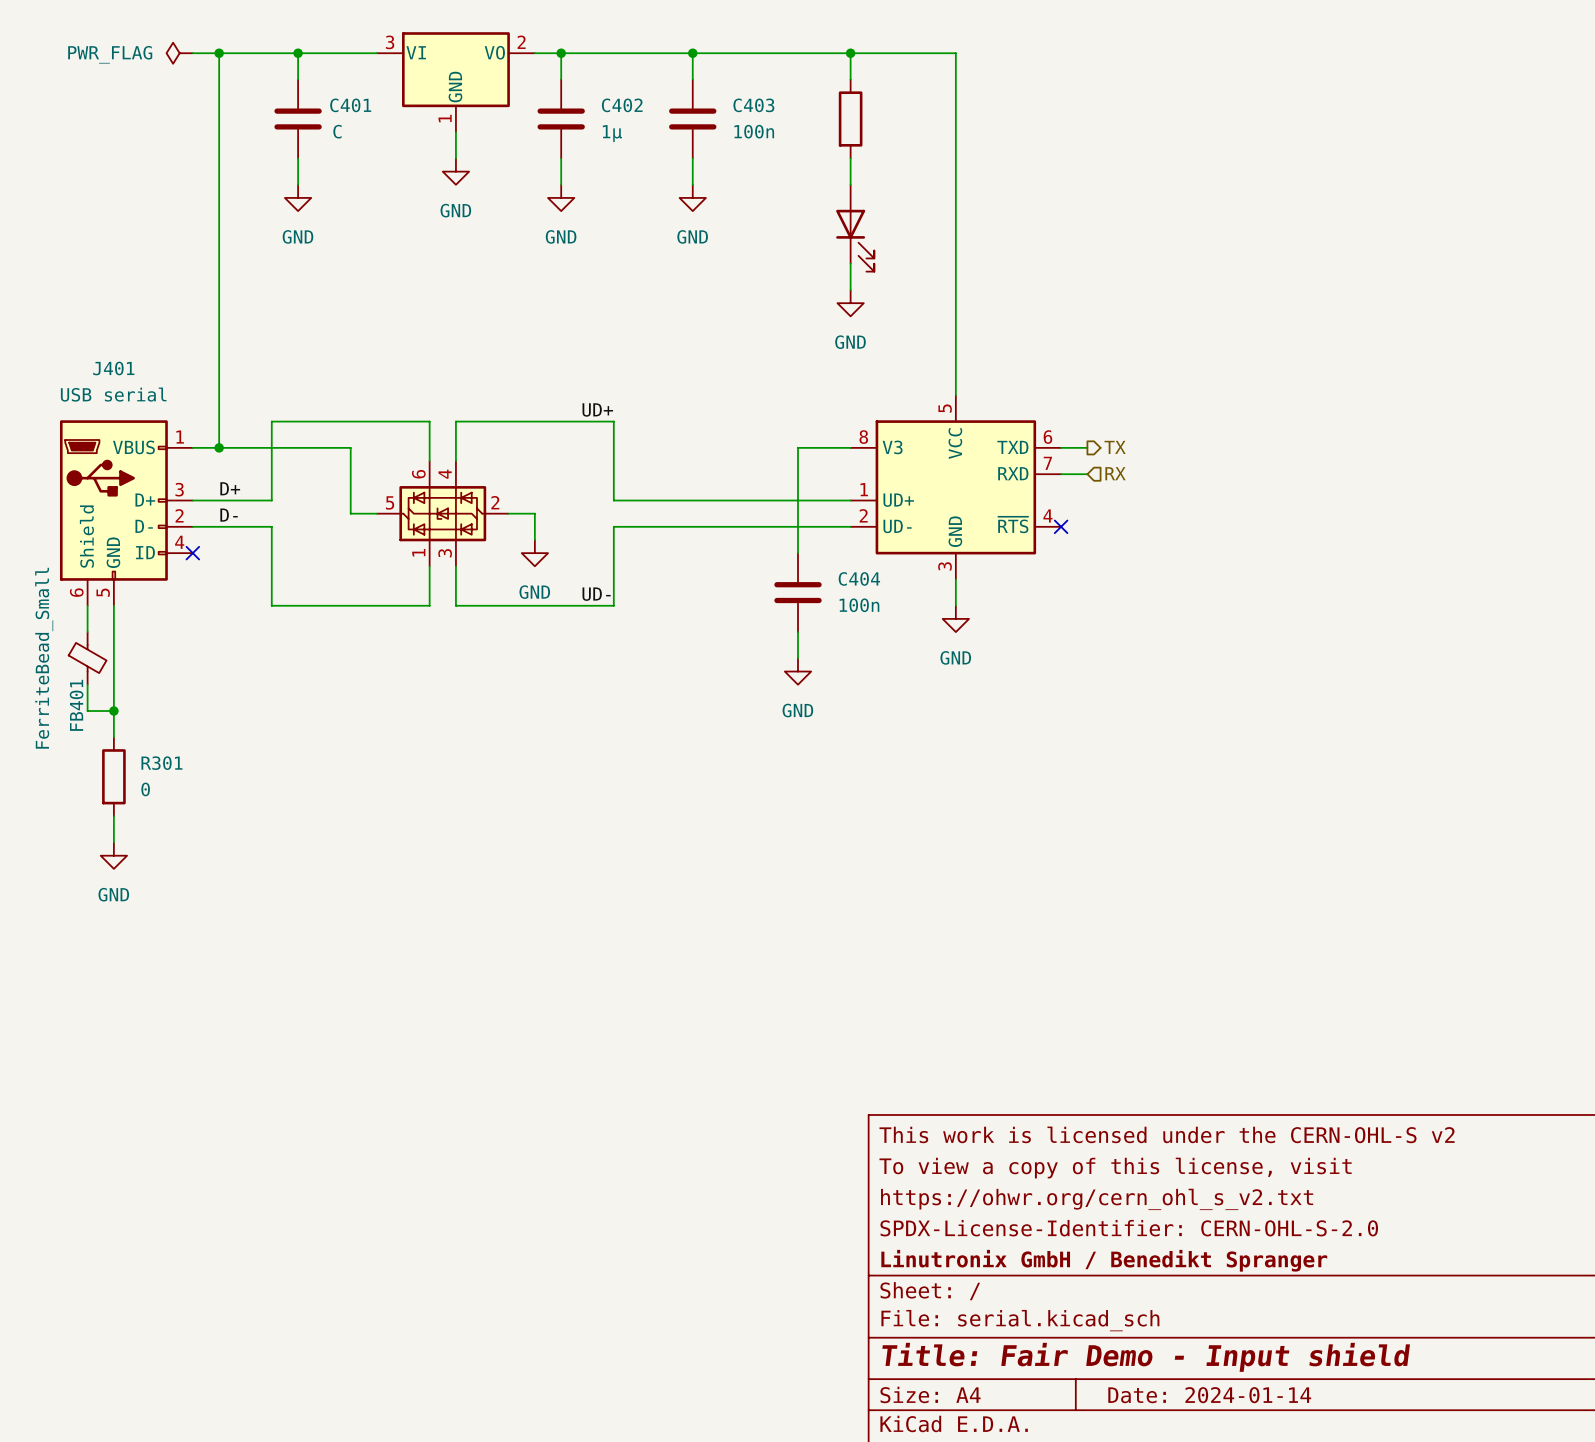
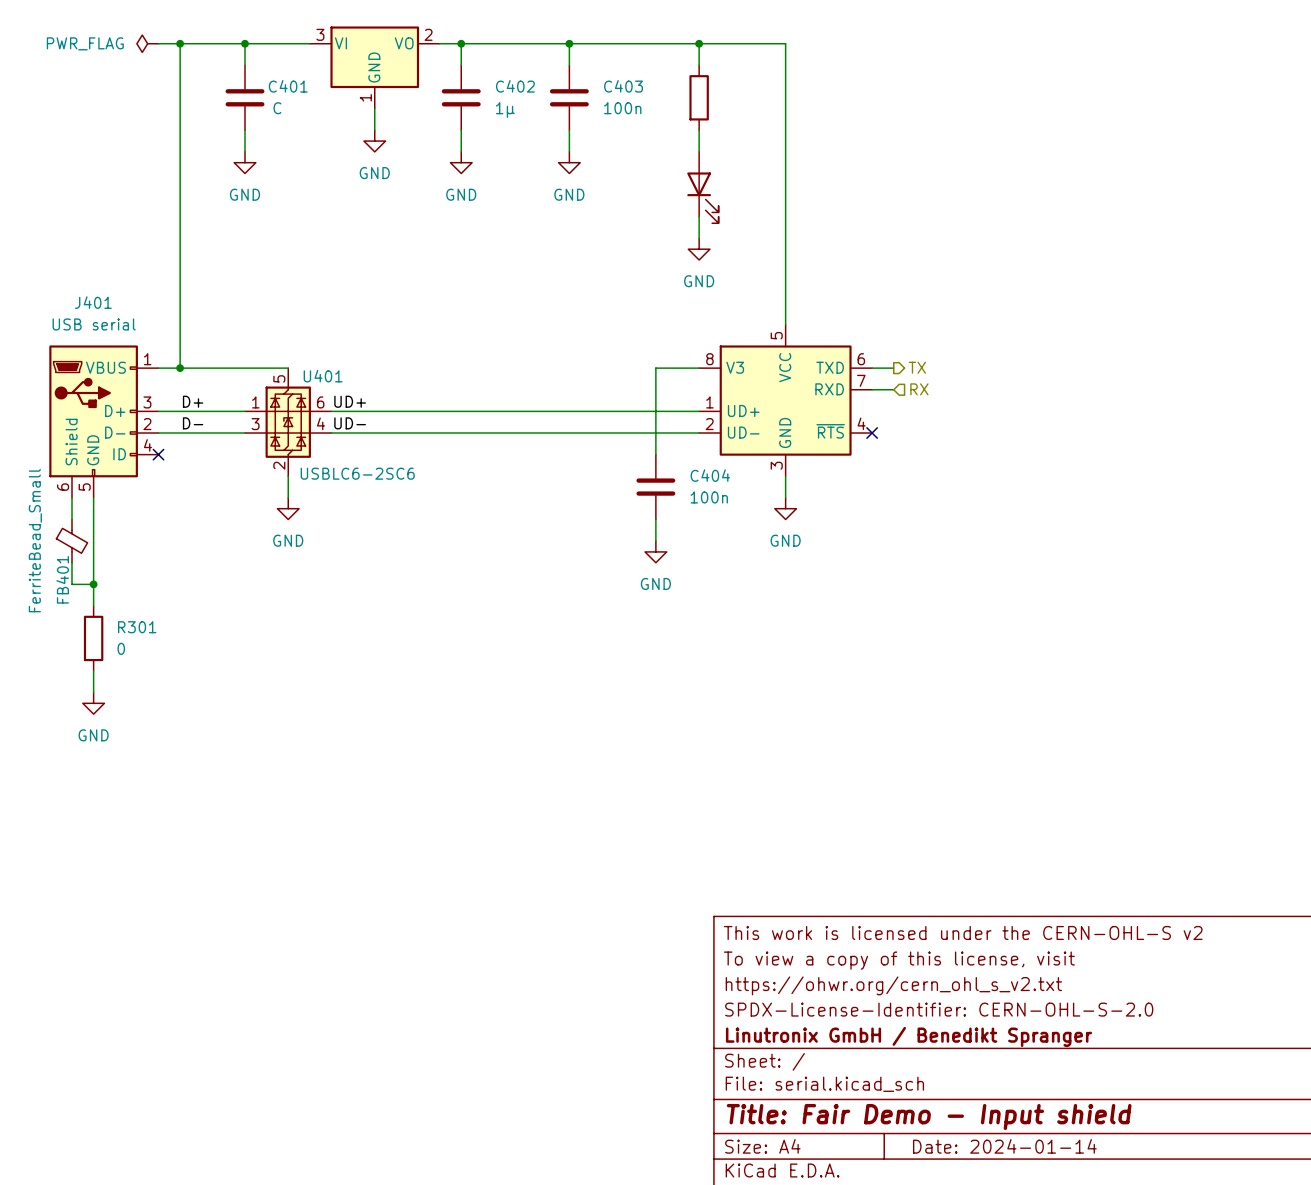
label position: UD+ (597, 409) -> UD+ (350, 401)
wire: (429, 461) (429, 421) (271, 421) (271, 500) -> (245, 411) (223, 411)
wire: (455, 461) (455, 421) (613, 421) (613, 500) -> (331, 411) (504, 411)
U401: none -> USBLC6-2SC6 (288, 422)
part: (442, 513) -> none
wire: (508, 513) (534, 513) (534, 539) -> none
wire: (271, 526) (271, 605) (429, 605) (429, 566) -> (223, 433) (245, 433)
wire: (613, 526) (613, 605) (455, 605) (455, 566) -> (504, 433) (331, 433)
power symbol position: GND (534, 553) -> GND (288, 508)
wire: none -> (288, 476) (288, 497)
label position: UD- (596, 594) -> UD- (350, 423)

